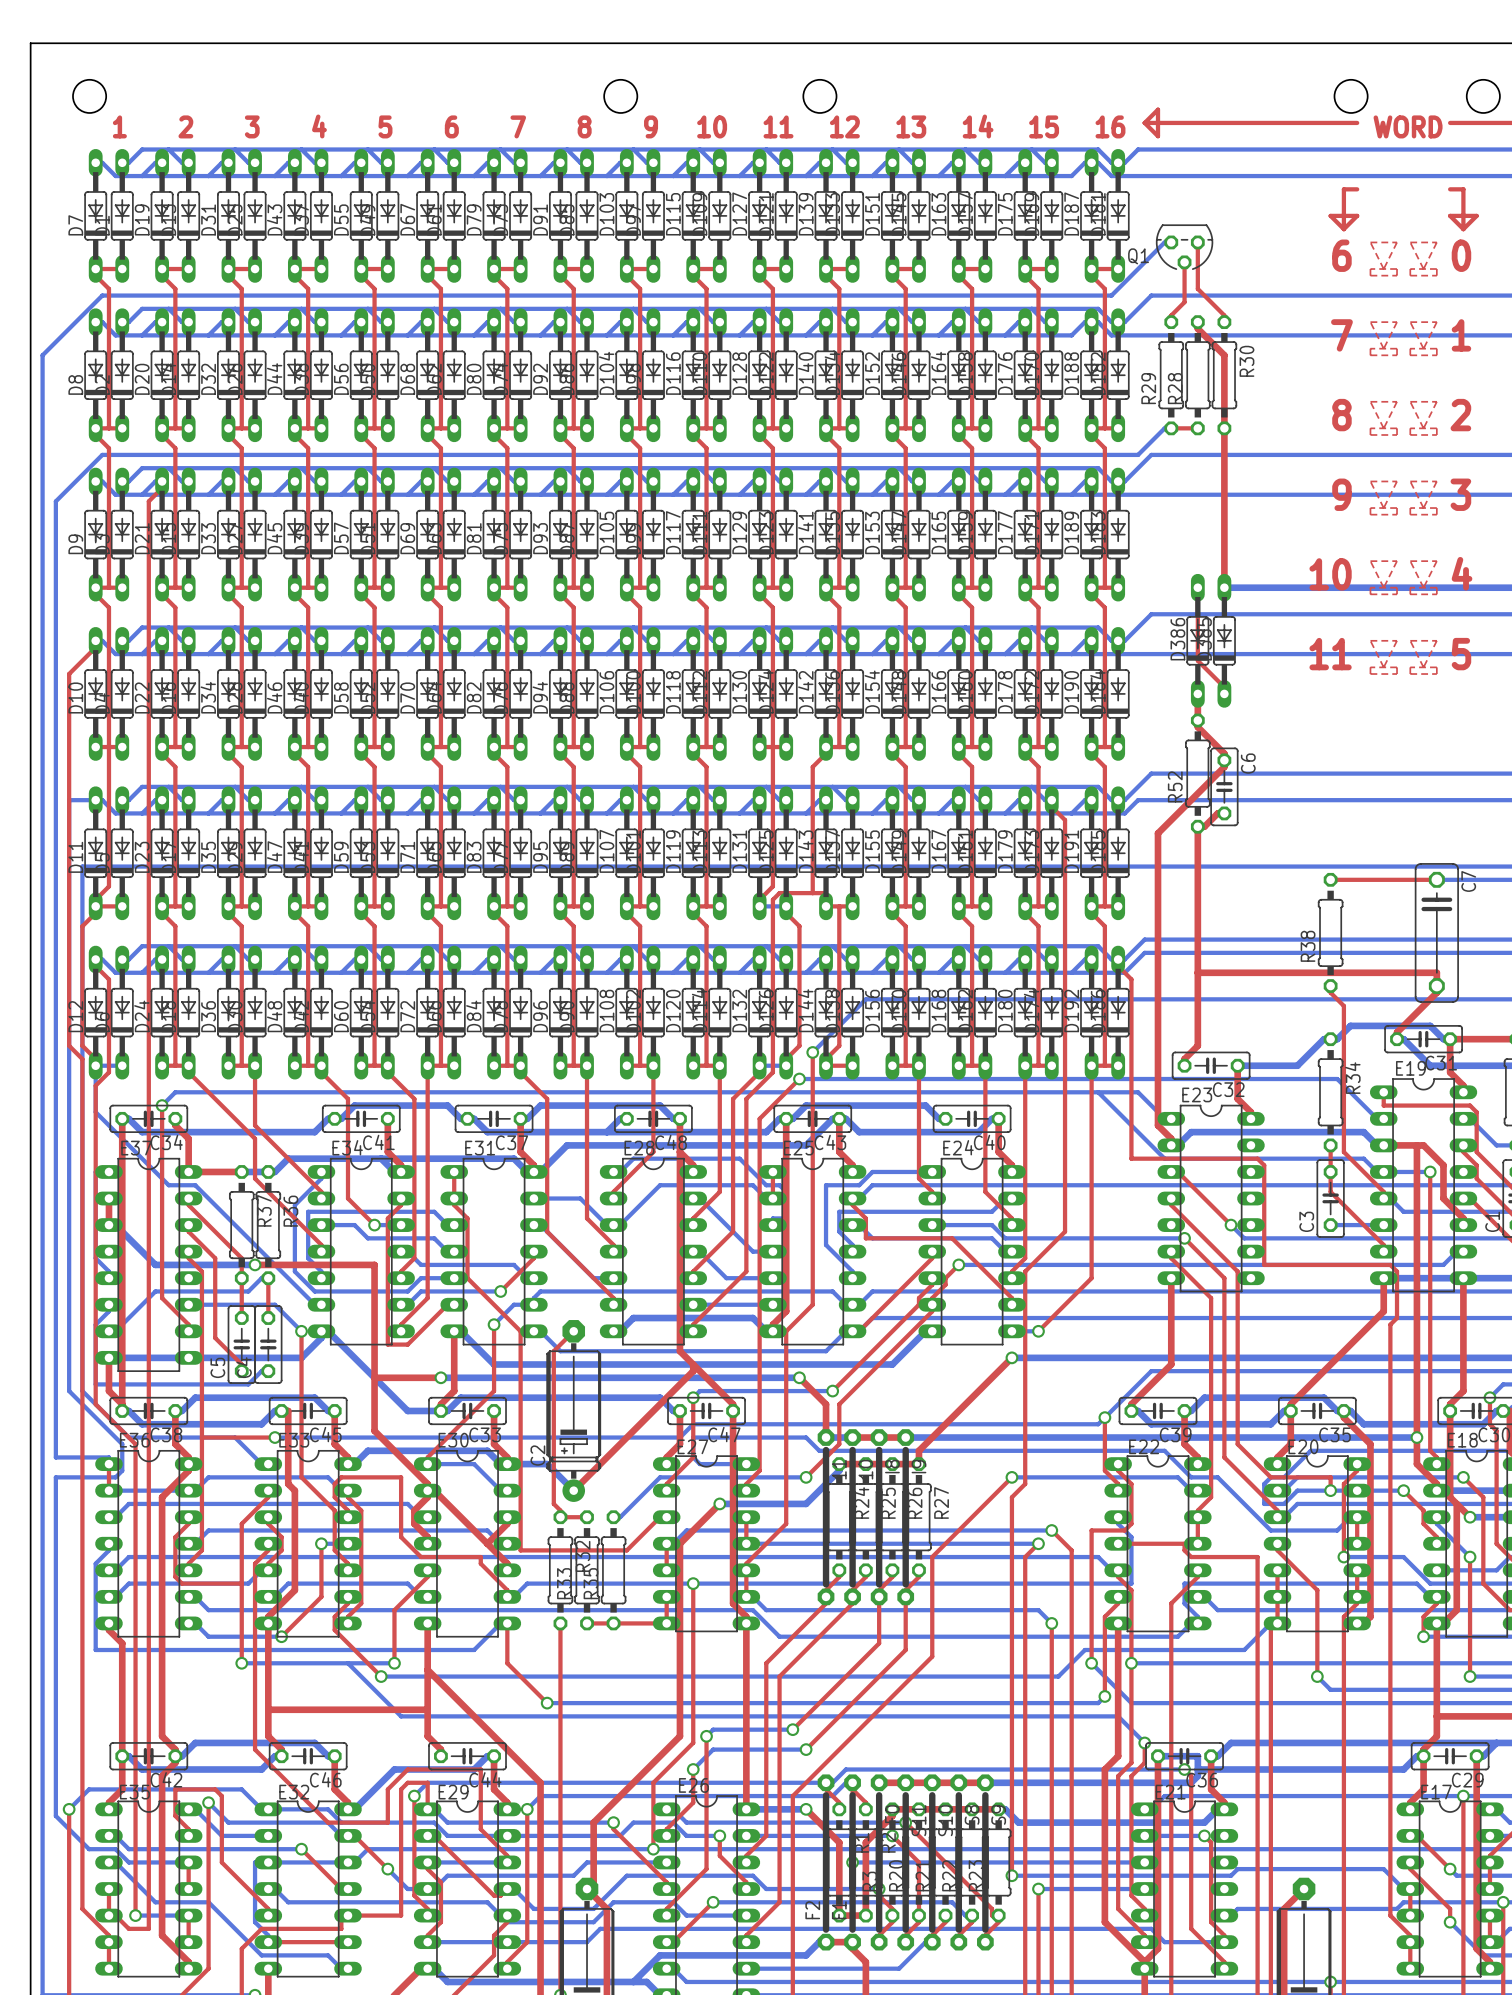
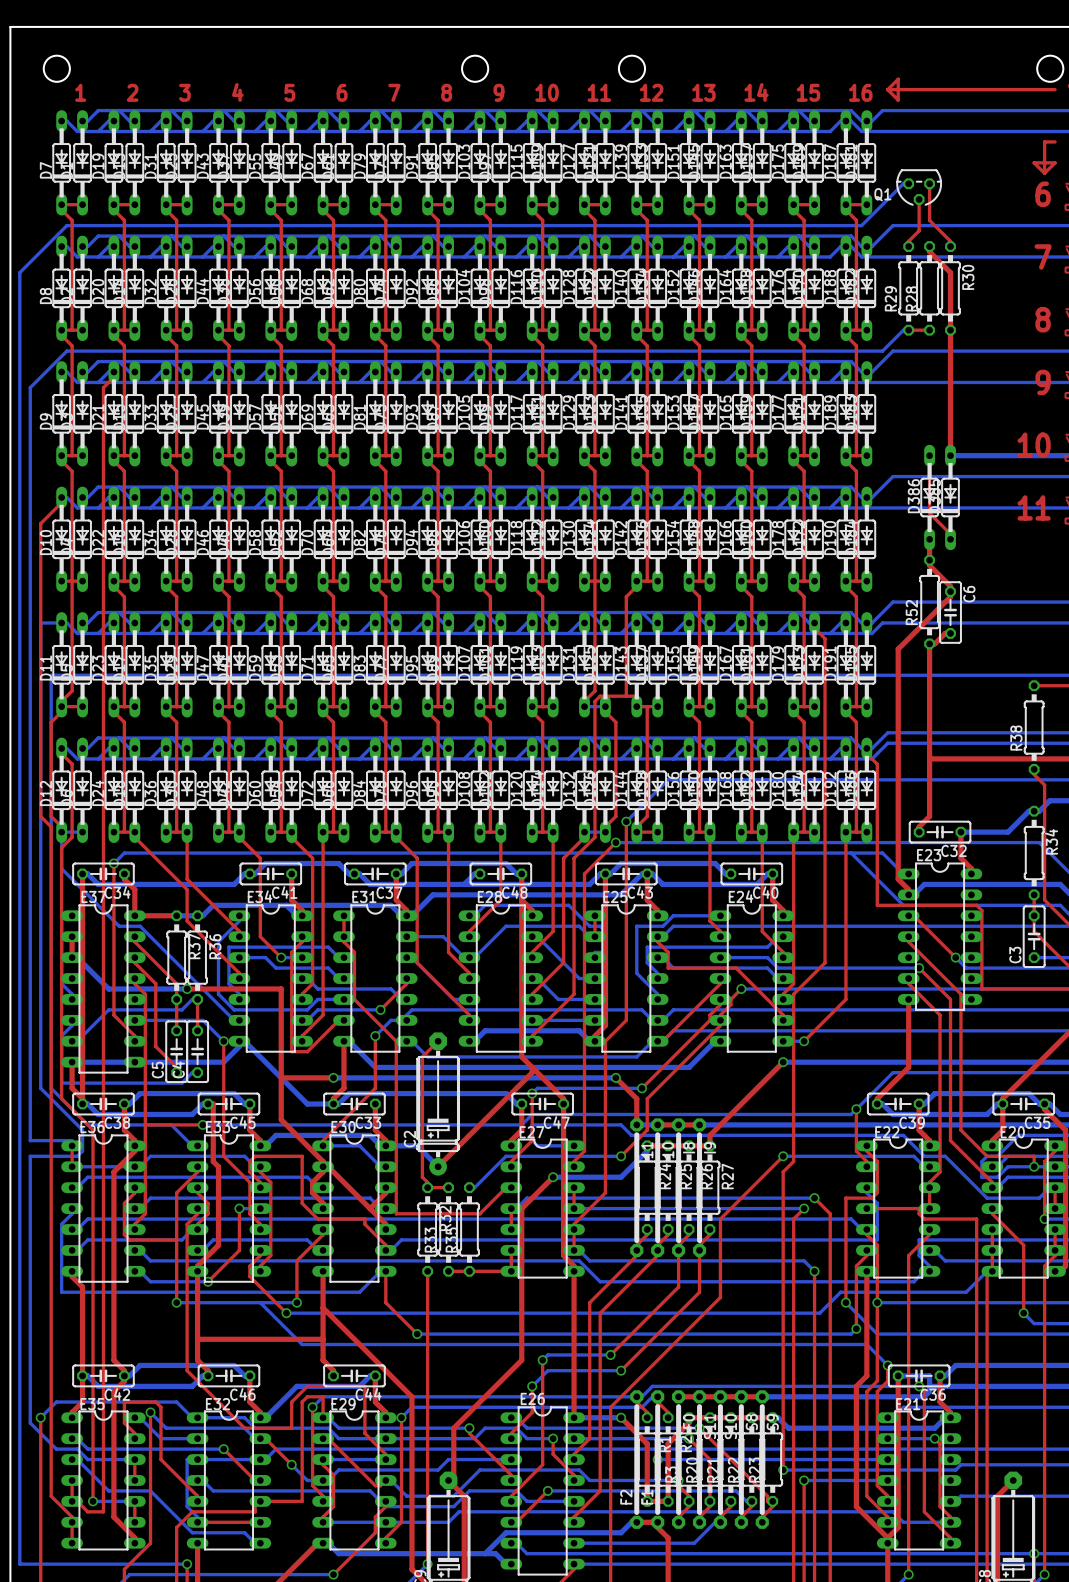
top track: (693, 1583) (693, 1742) (653, 1782) (653, 1849) -> none
via: (693, 1583) -> none
via: (653, 1849) -> none

